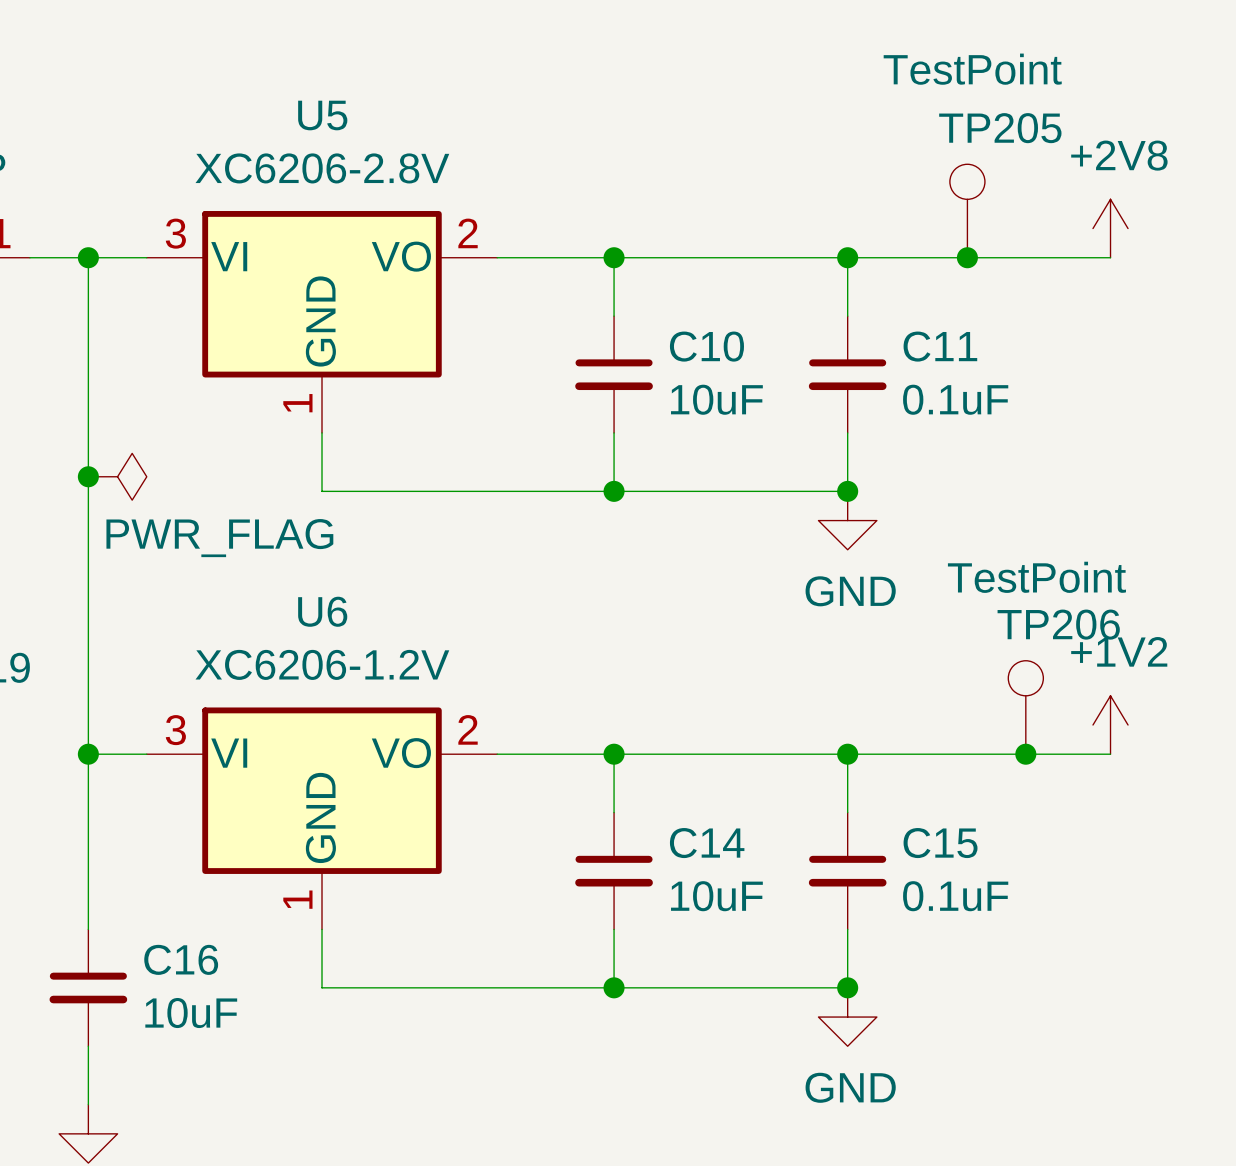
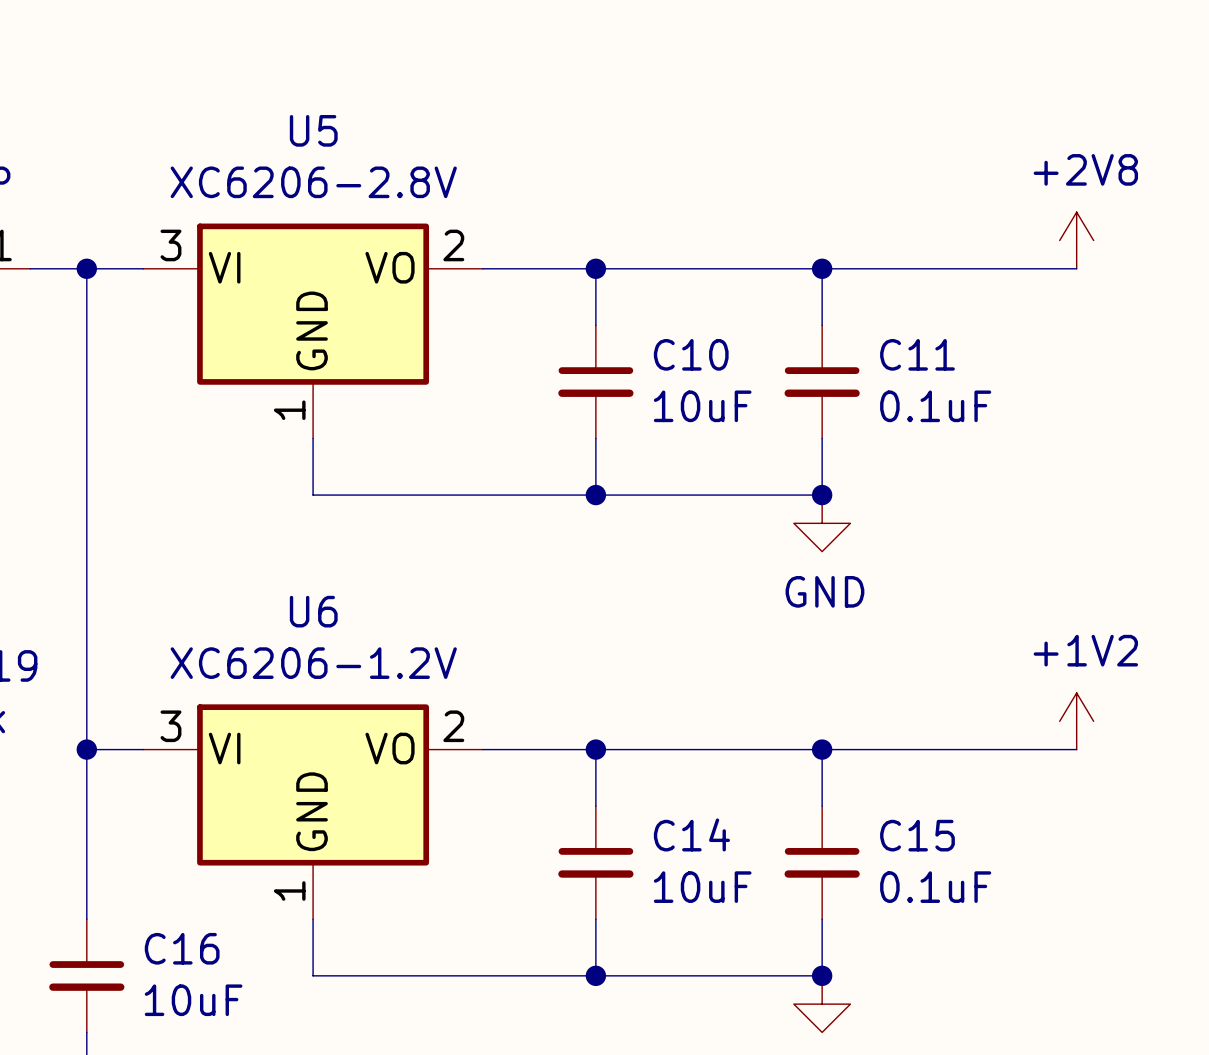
TP205: TestPoint (967, 211) -> none
junction: (967, 257) -> none
junction: (88, 476) -> none
power symbol: PWR_FLAG (117, 476) -> none
TP206: TestPoint (1025, 707) -> none
junction: (1025, 754) -> none

